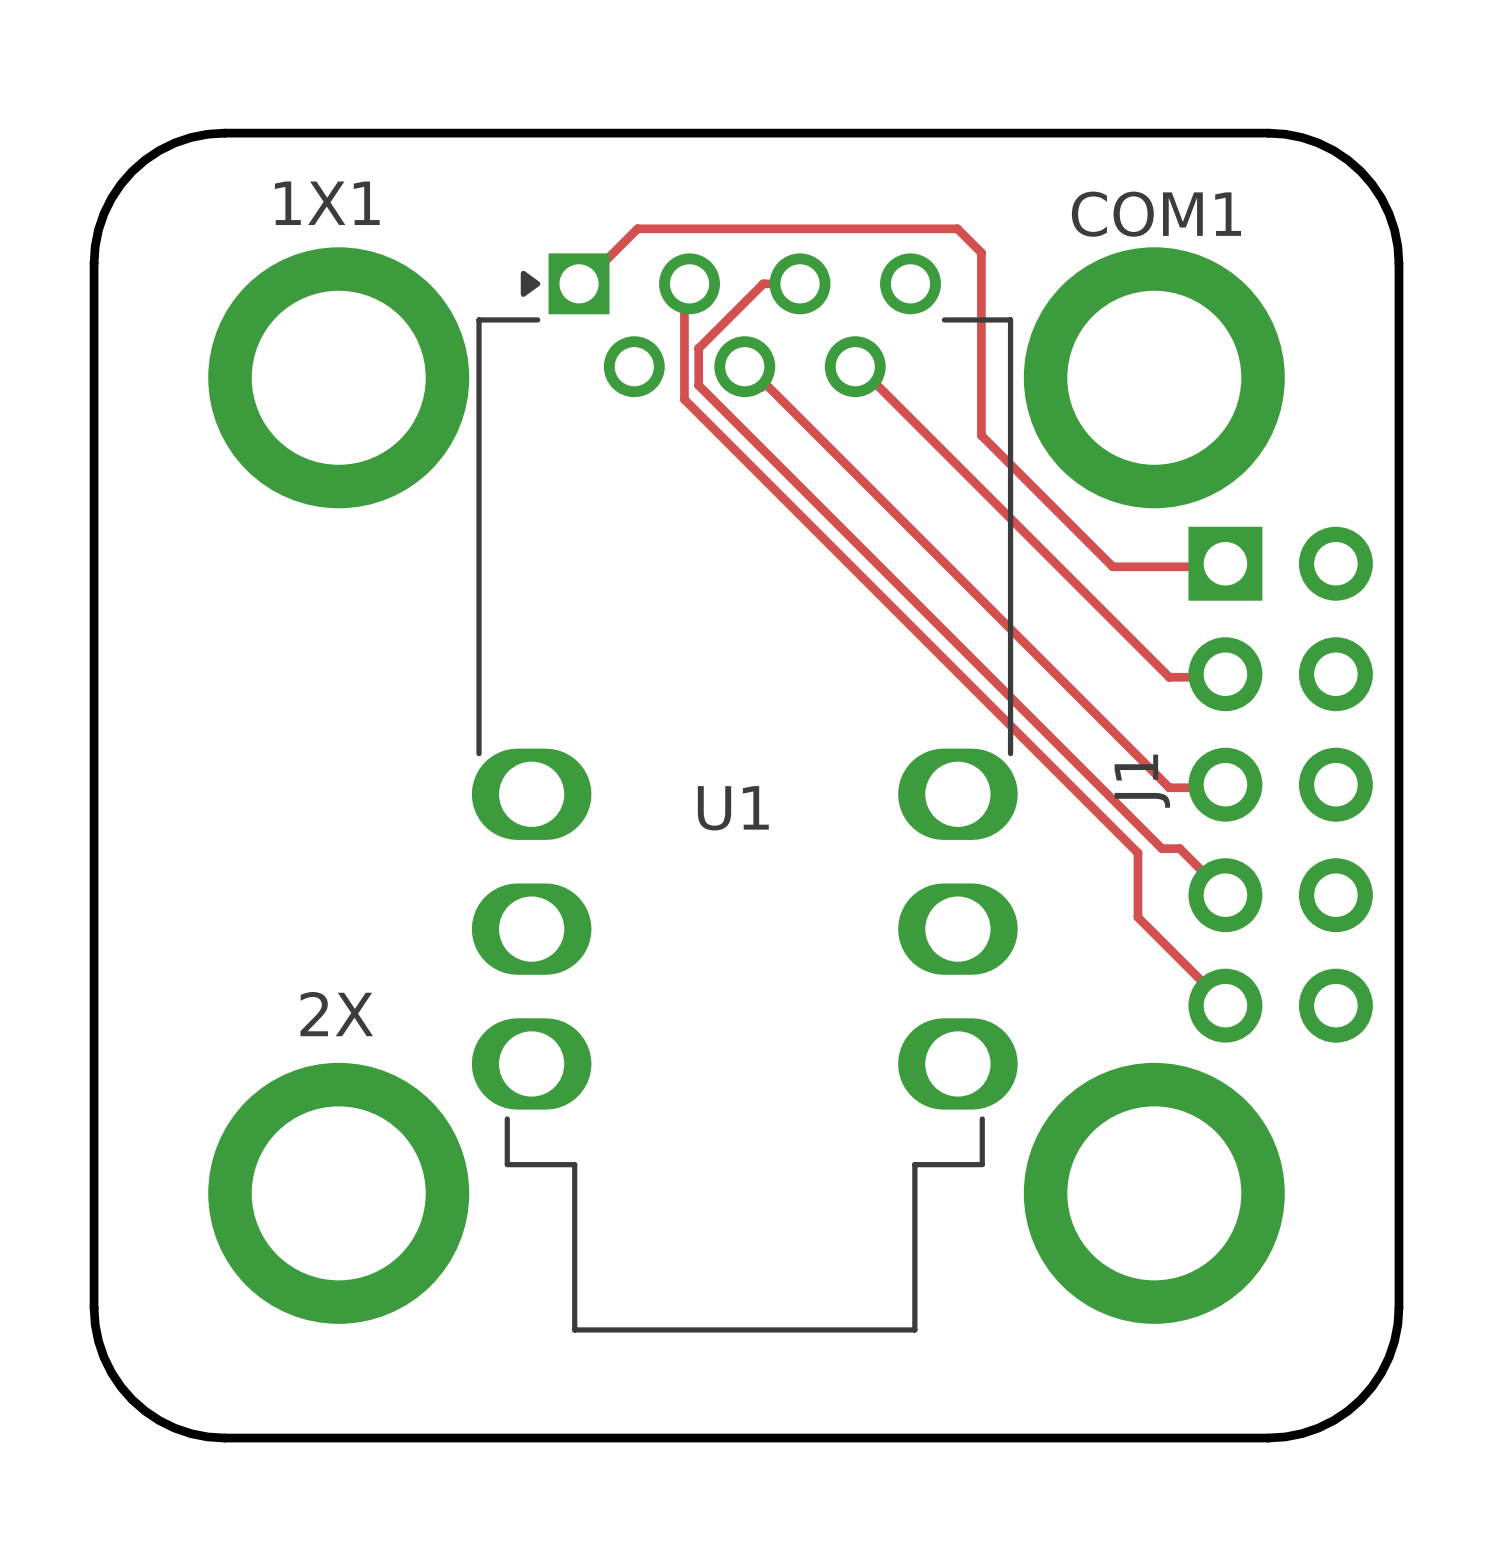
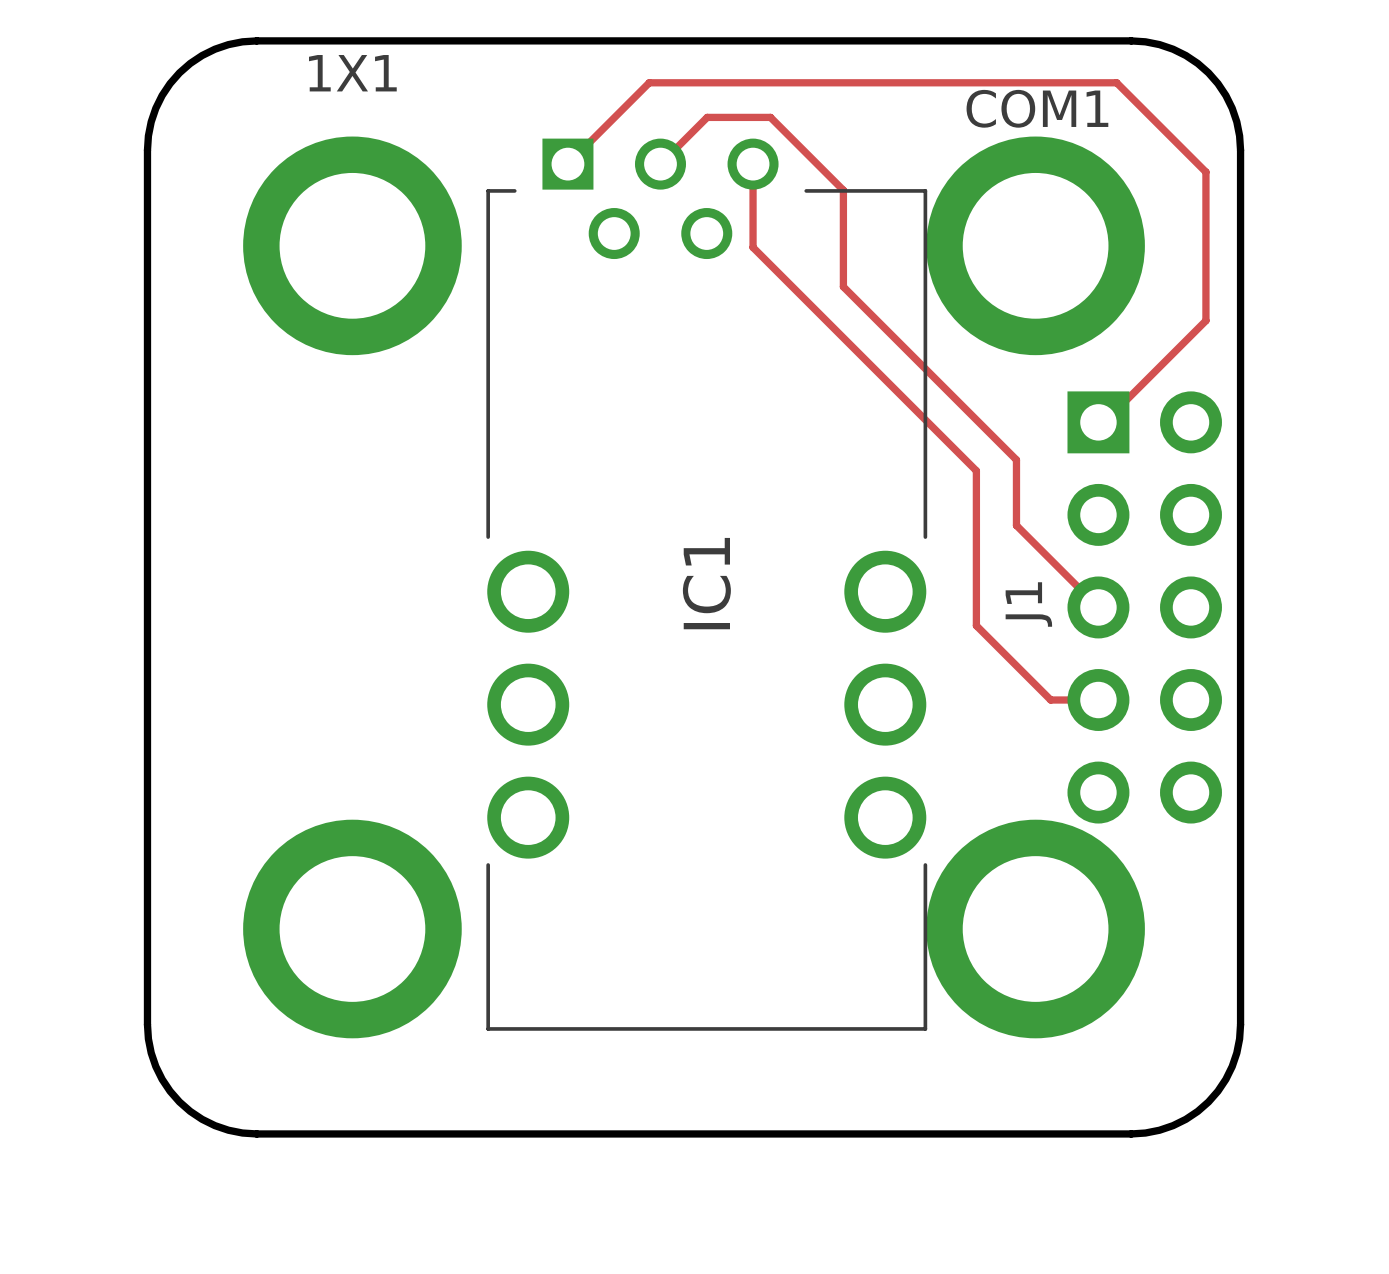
1X1 name position: 1X1 (327, 203) -> 1X1 (352, 73)
track: none -> (567, 164) (649, 82) (1116, 82) (1205, 172) (1205, 320) (1102, 424)
track: none -> (660, 164) (707, 117) (770, 117) (843, 190) (843, 286) (1016, 459) (1016, 525) (1098, 607)
track: none -> (753, 164) (753, 247) (976, 470) (976, 625) (1050, 700) (1098, 700)
track: (582, 283) (637, 228) (957, 228) (981, 252) (981, 435) (1112, 566) (1229, 566) -> none
track: (693, 283) (684, 292) (684, 399) (1137, 853) (1137, 917) (1229, 1008) -> none
track: (803, 283) (763, 283) (698, 348) (698, 385) (1161, 848) (1179, 848) (1229, 898) -> none
track: (748, 366) (1169, 787) (1229, 787) -> none
track: (858, 366) (1169, 677) (1229, 677) -> none
IC1: none -> (706, 584)
J1 position: (1280, 784) -> (1144, 607)
U1: (744, 792) -> none
text: 2X (336, 1014) -> none

